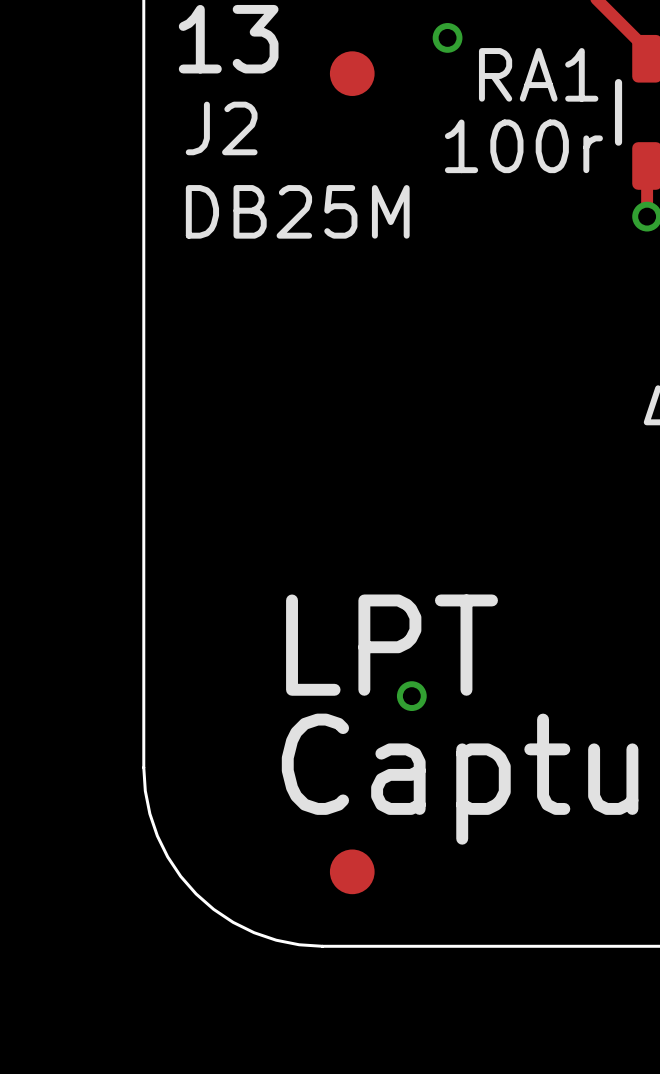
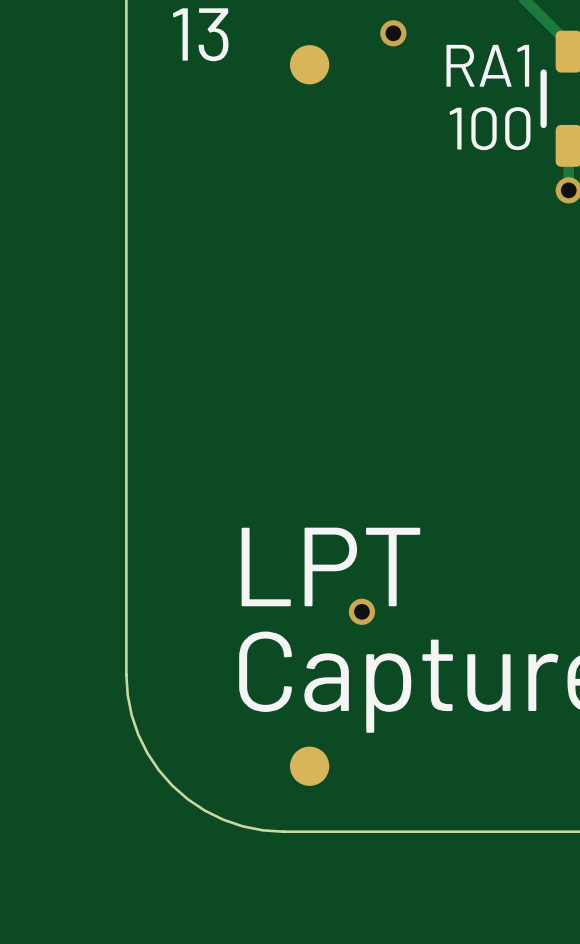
J2 name: J2 (221, 128) -> none
RA1 value: 100r (523, 146) -> 100 (490, 128)
J2 value: DB25M (297, 211) -> none

